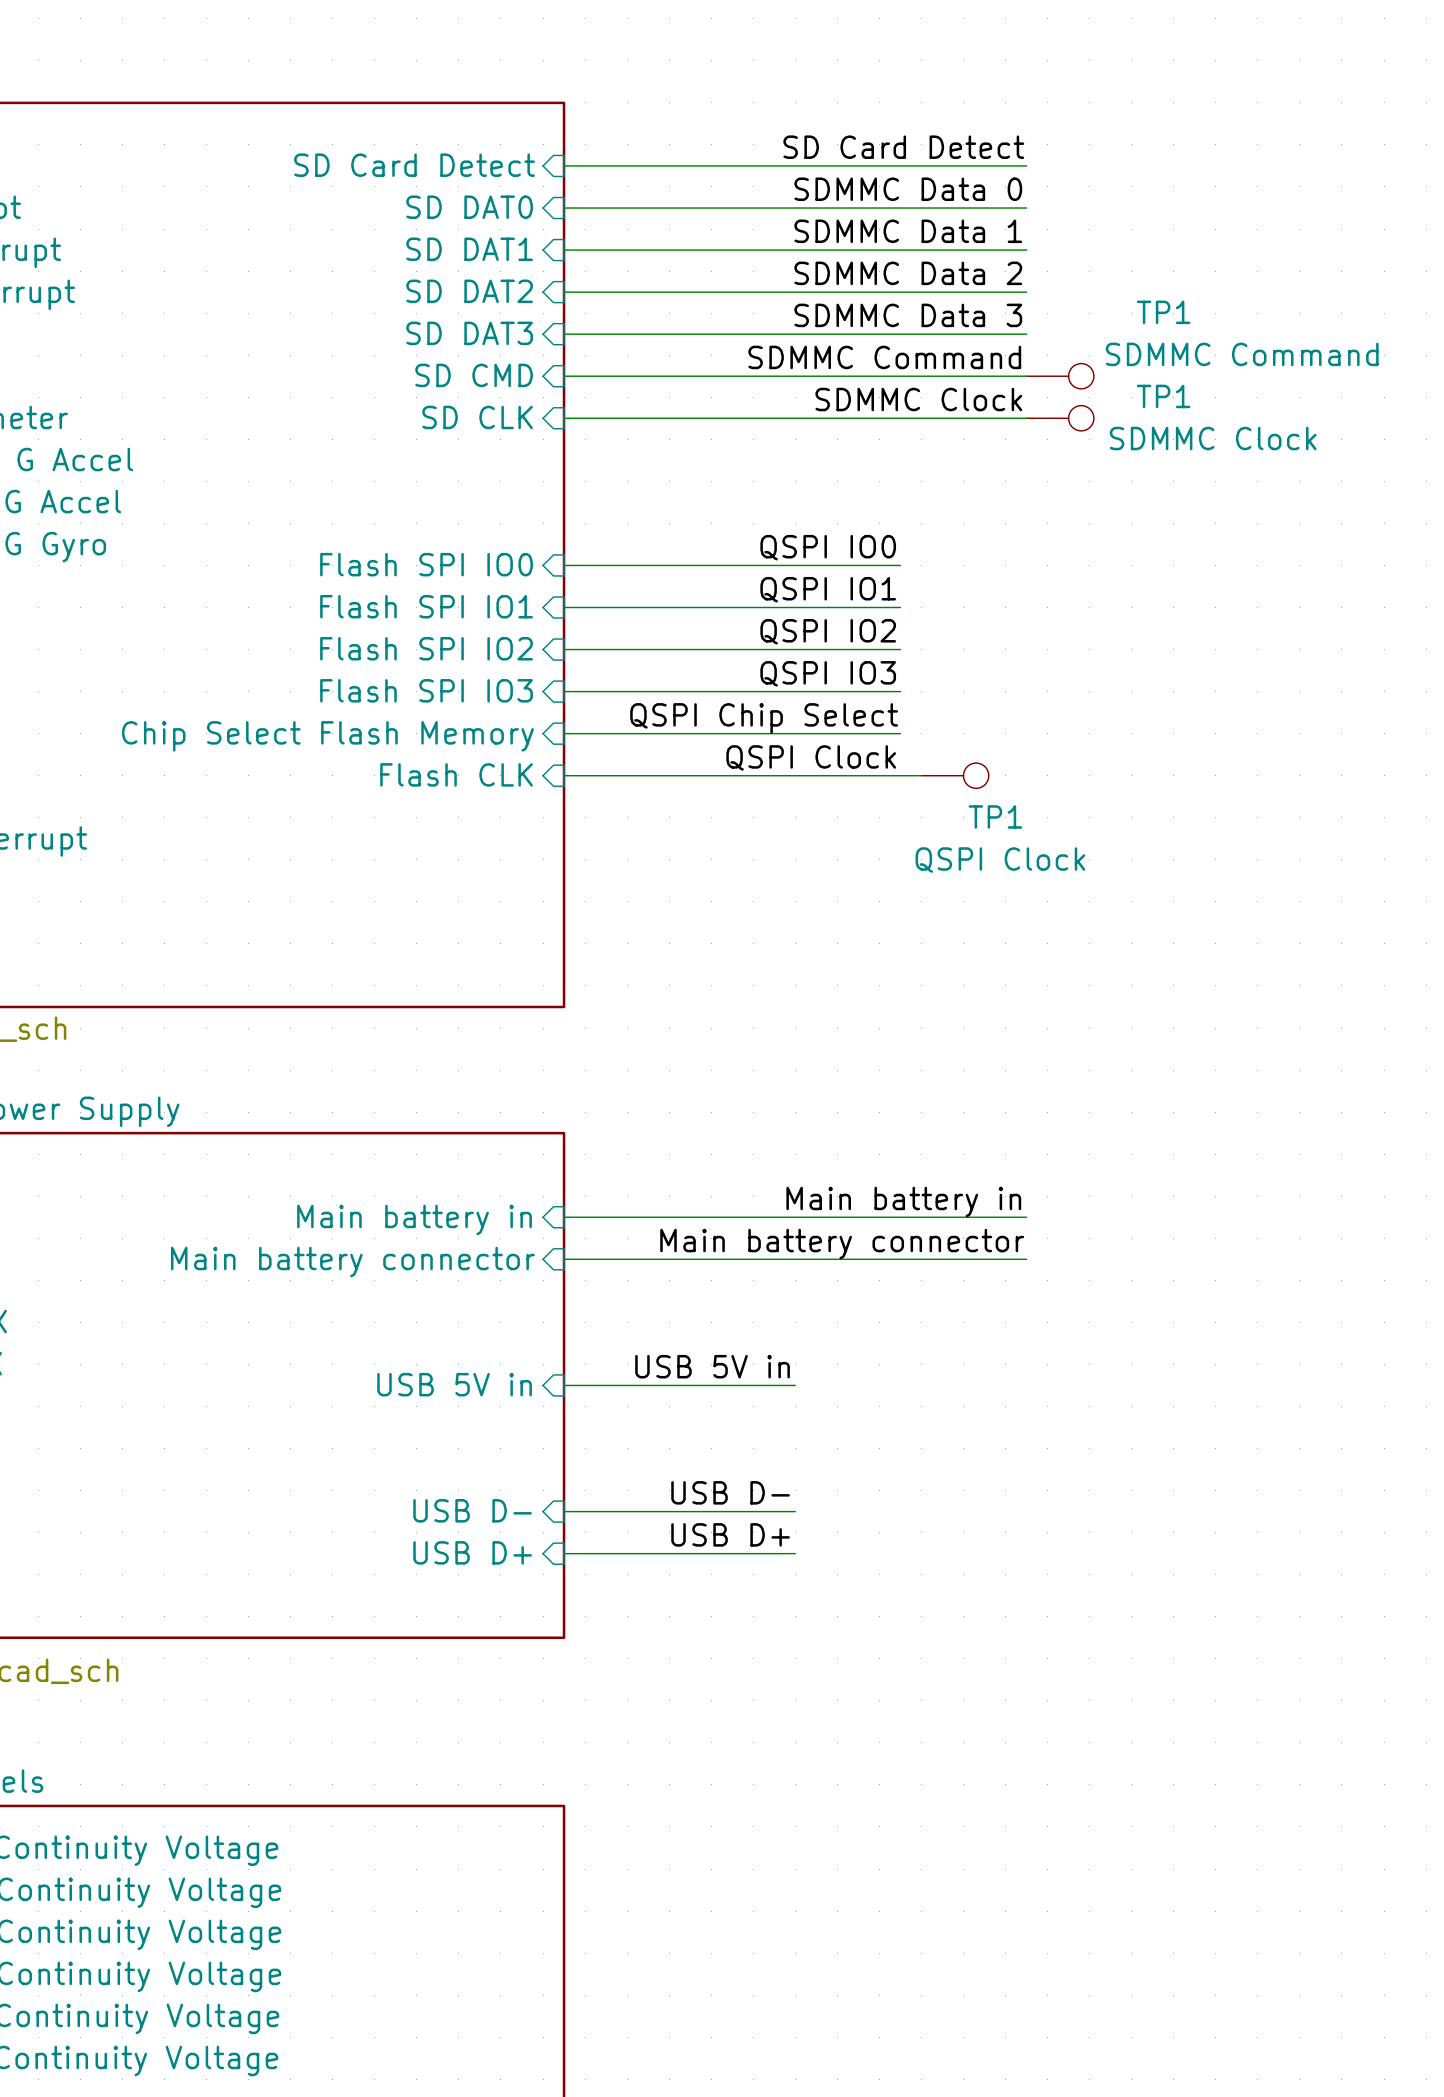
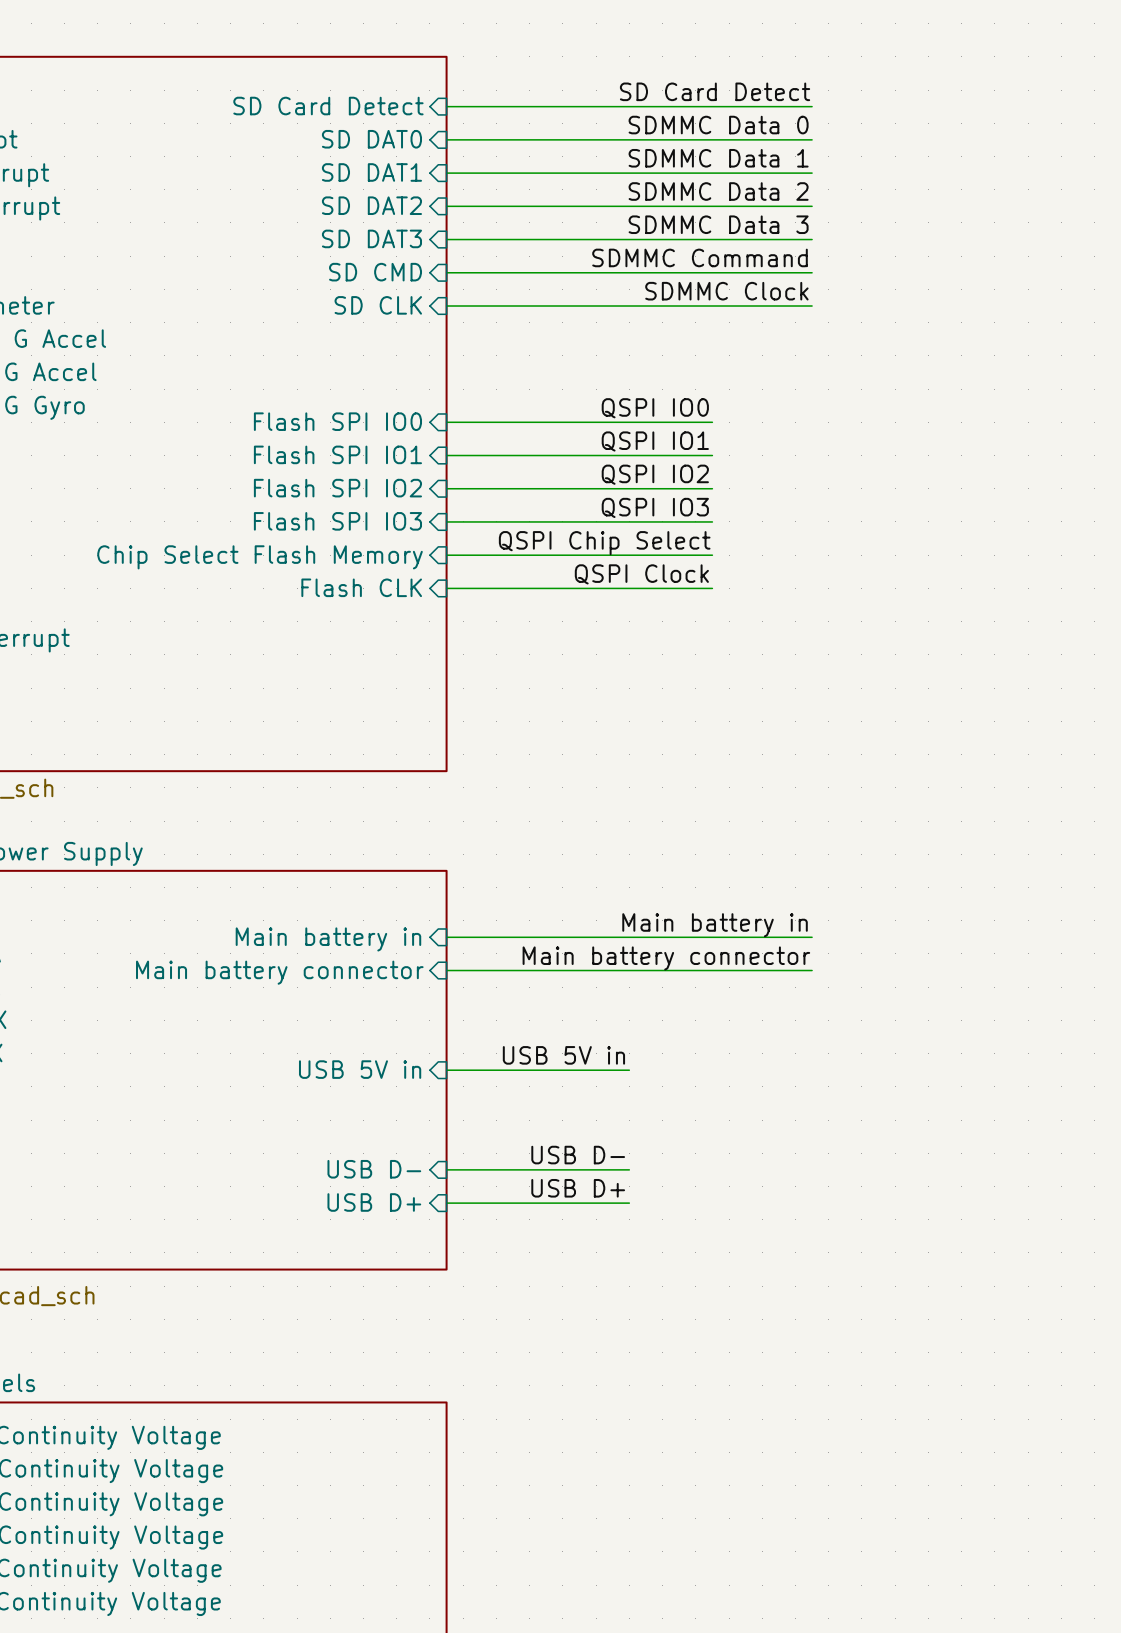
TP1: SDMMC Command (1060, 376) -> none
TP1: SDMMC Clock (1060, 418) -> none
wire: (900, 775) (921, 775) -> none
TP1: QSPI Clock (955, 775) -> none

